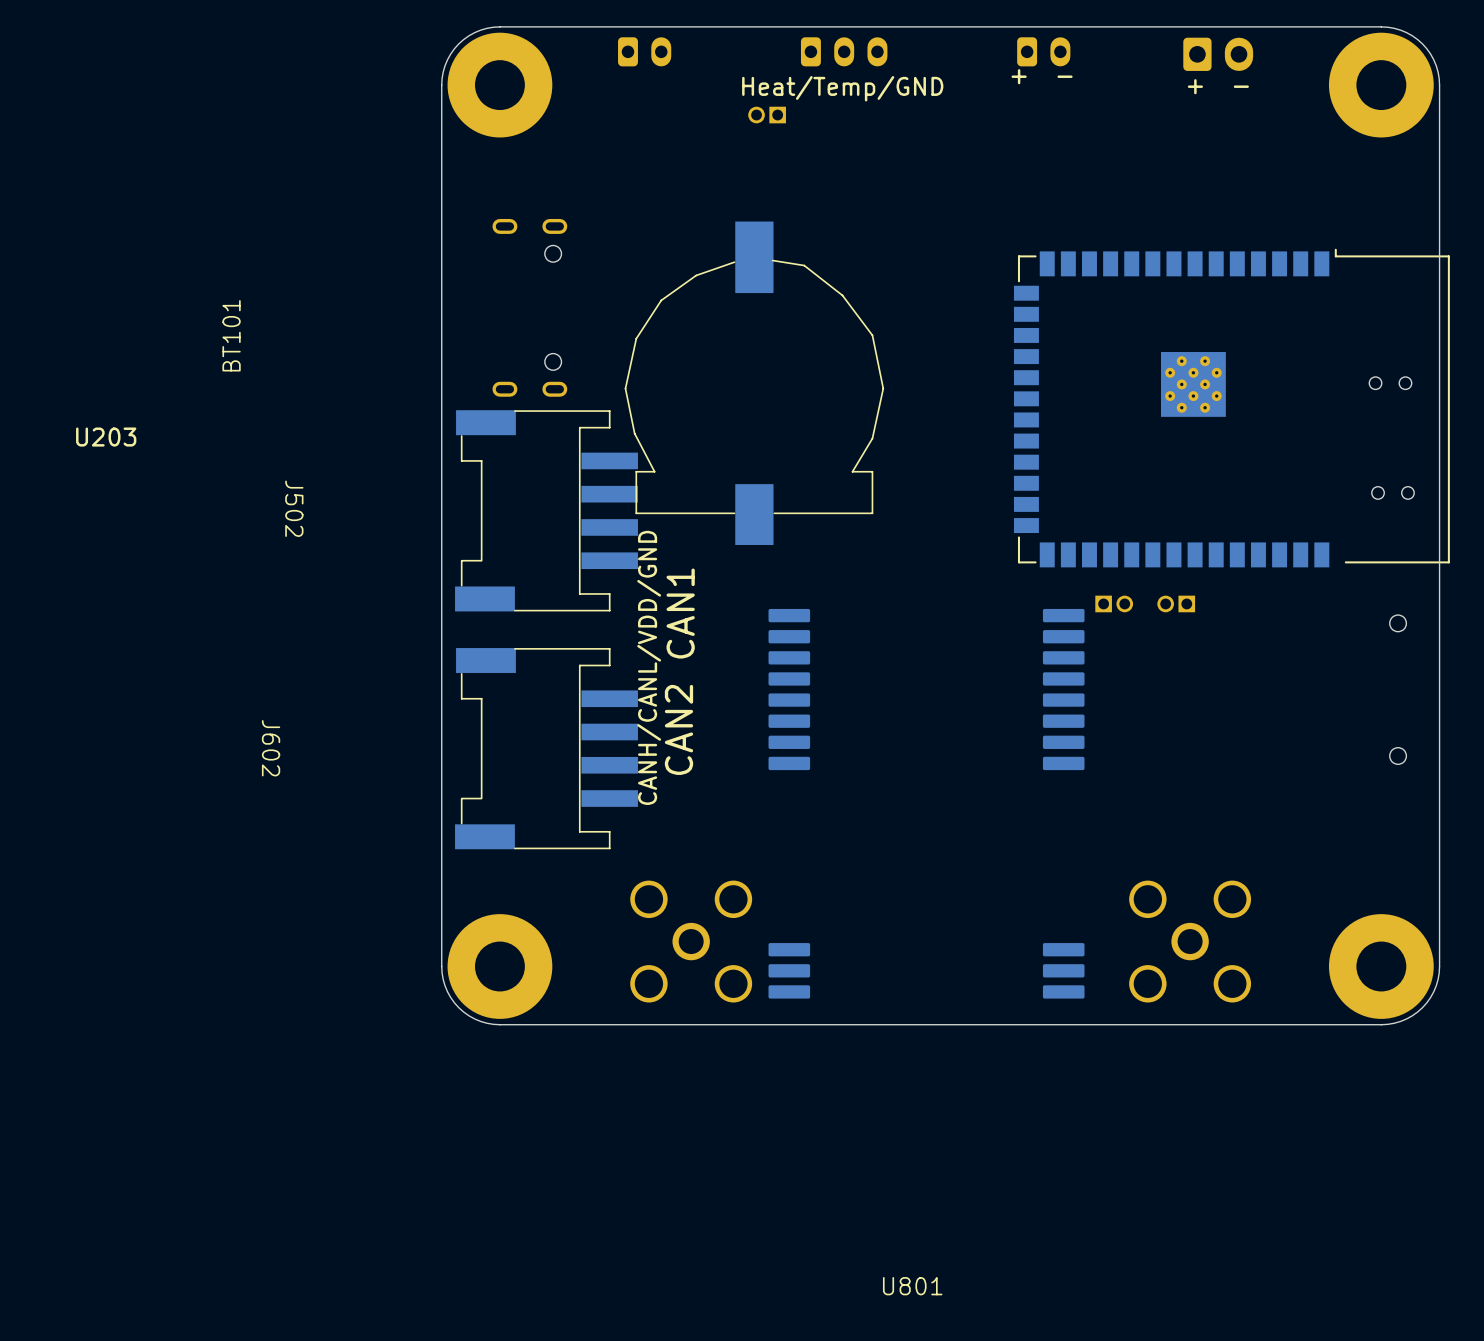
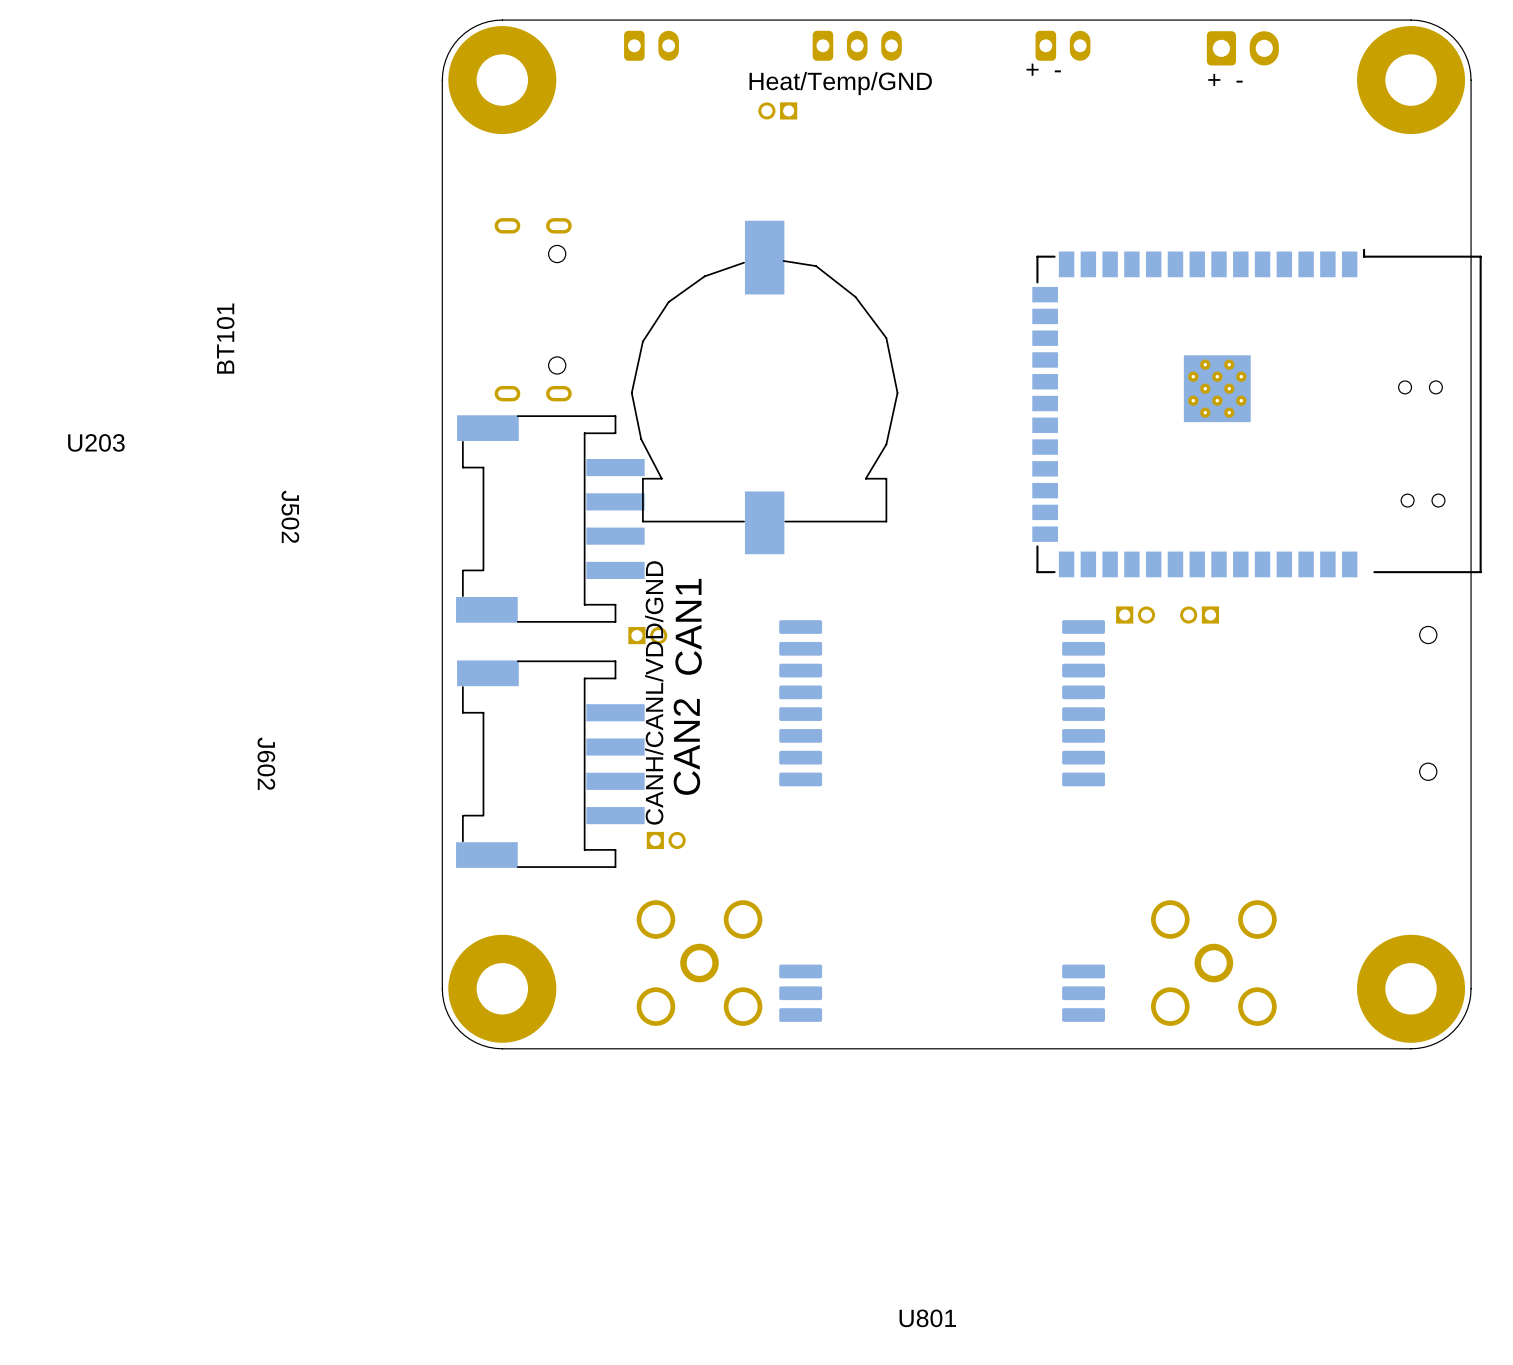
part: none -> (647, 635)
part: none -> (666, 840)

